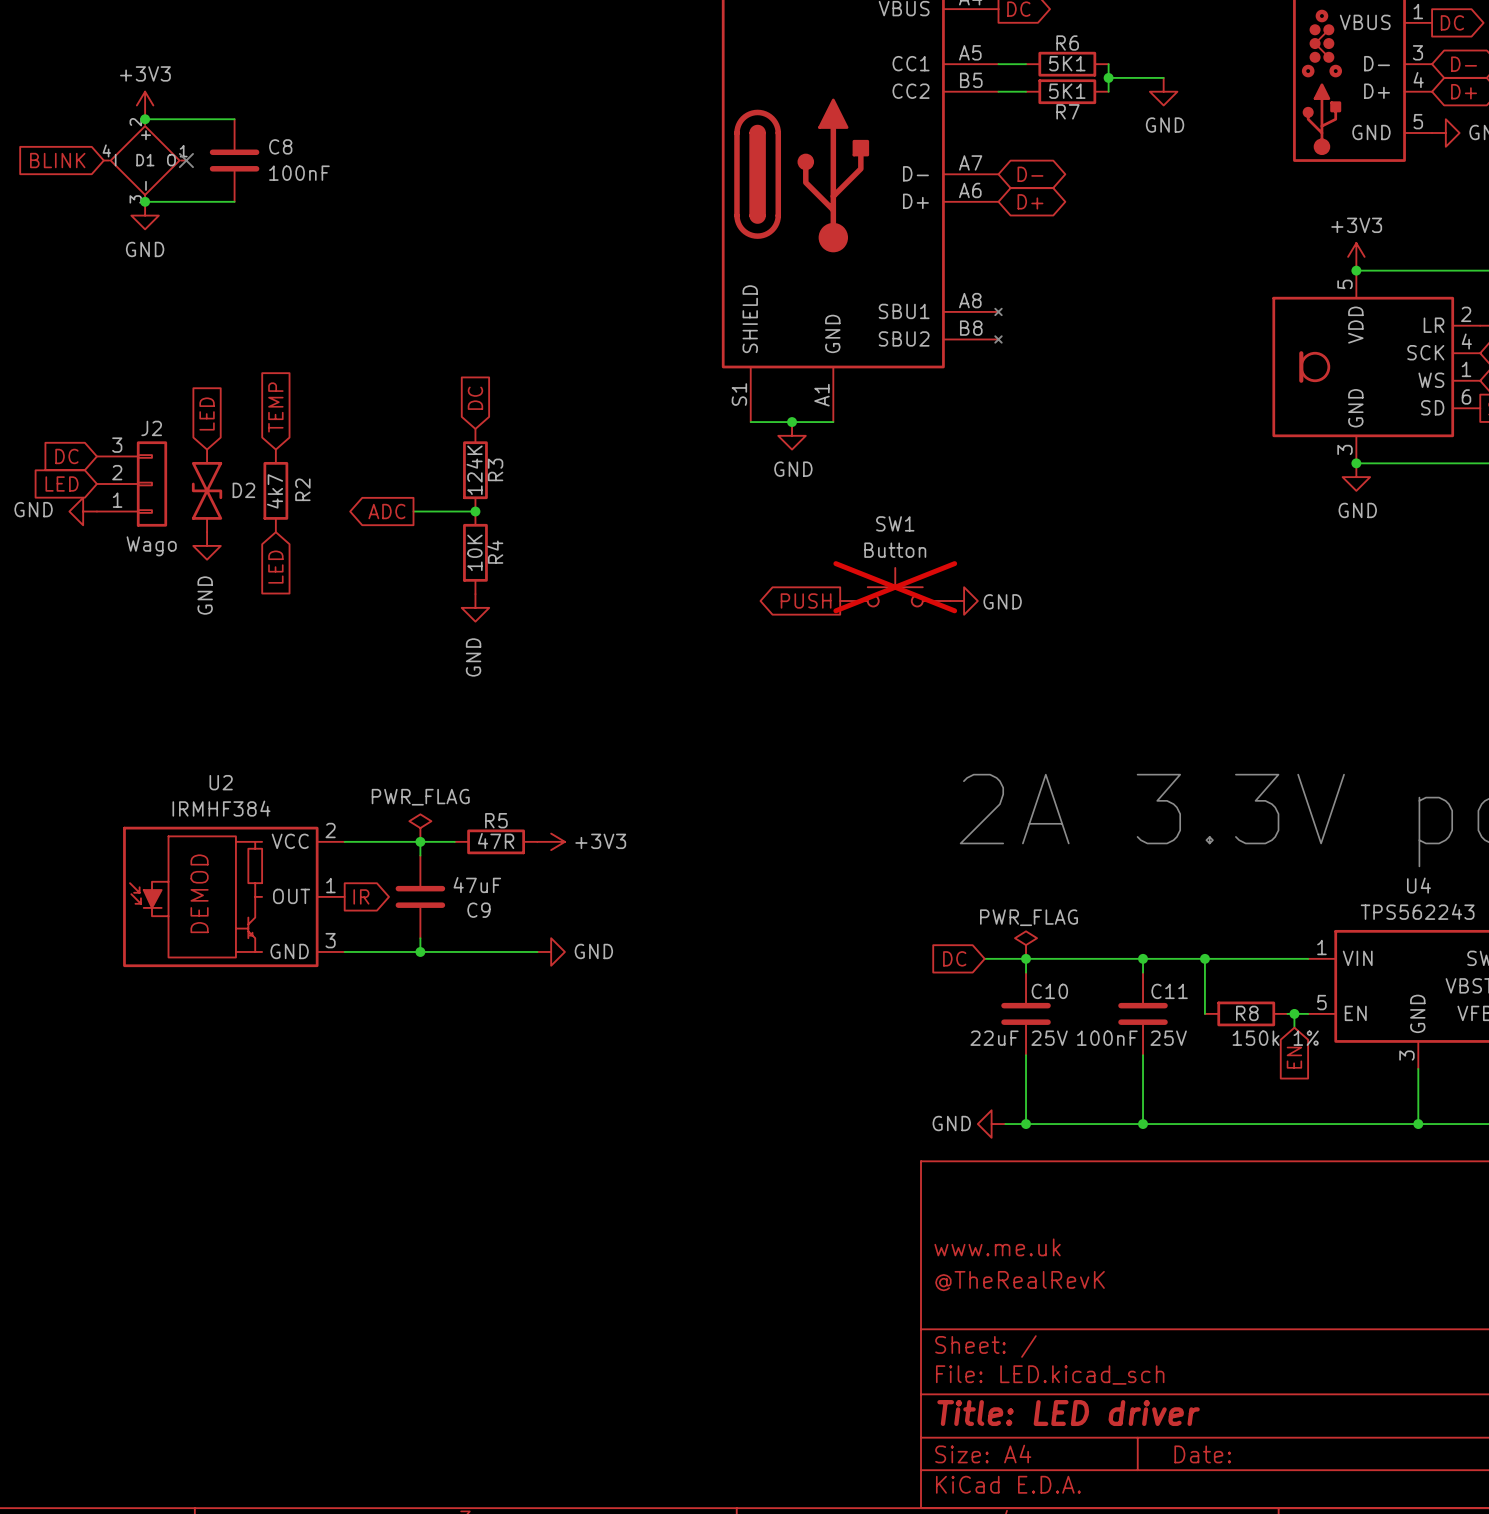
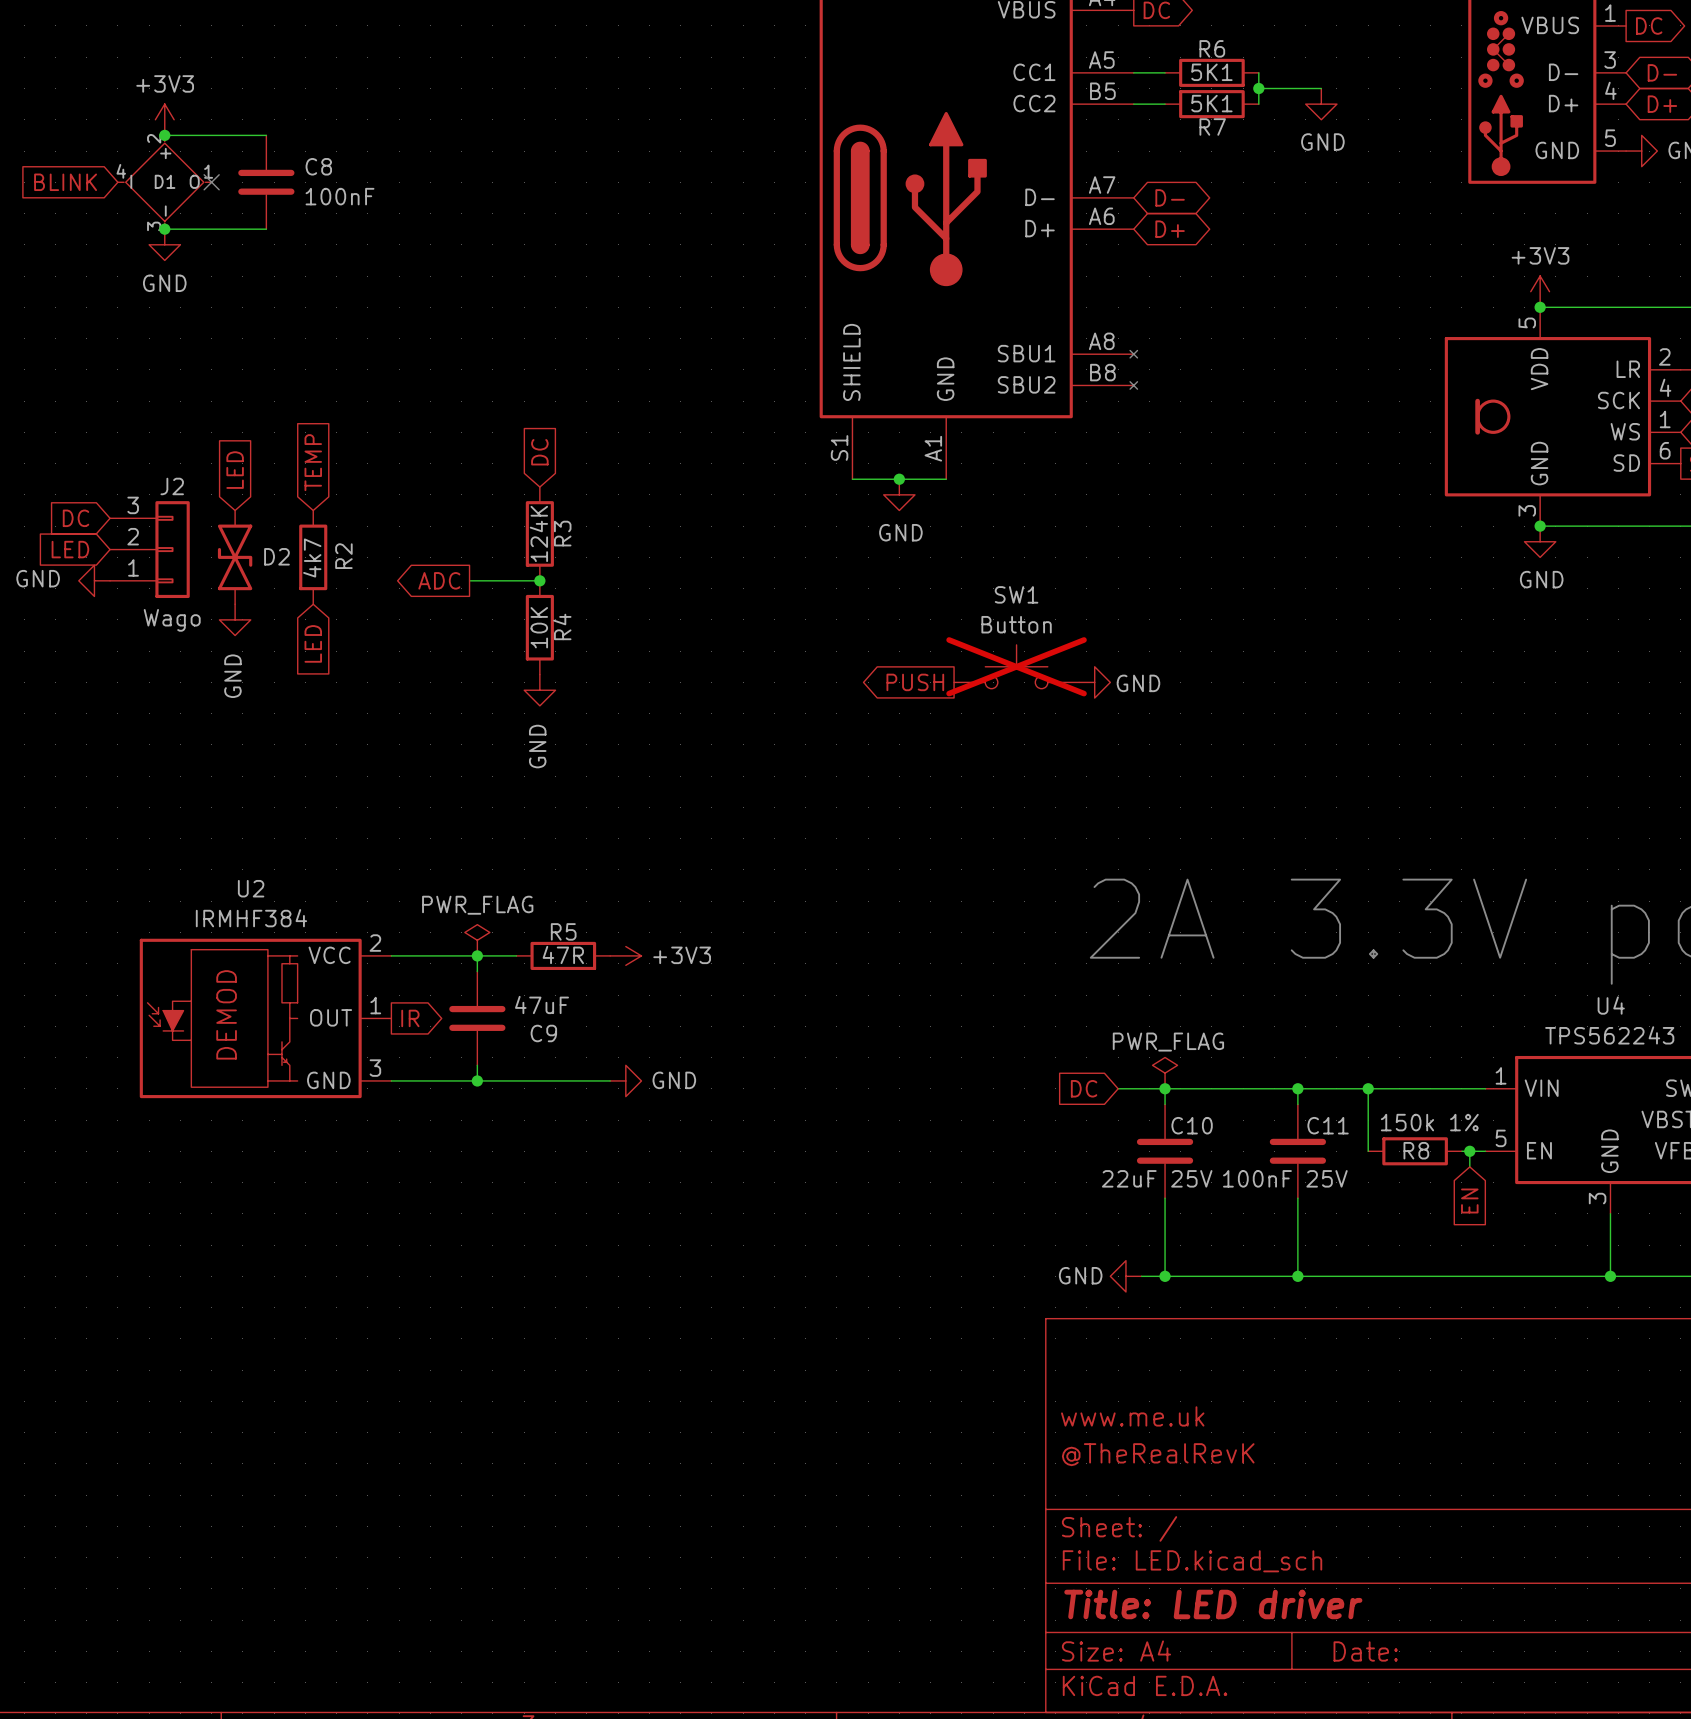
R8 value position: 150k 1% (1275, 1038) -> 150k 1% (1429, 1122)

